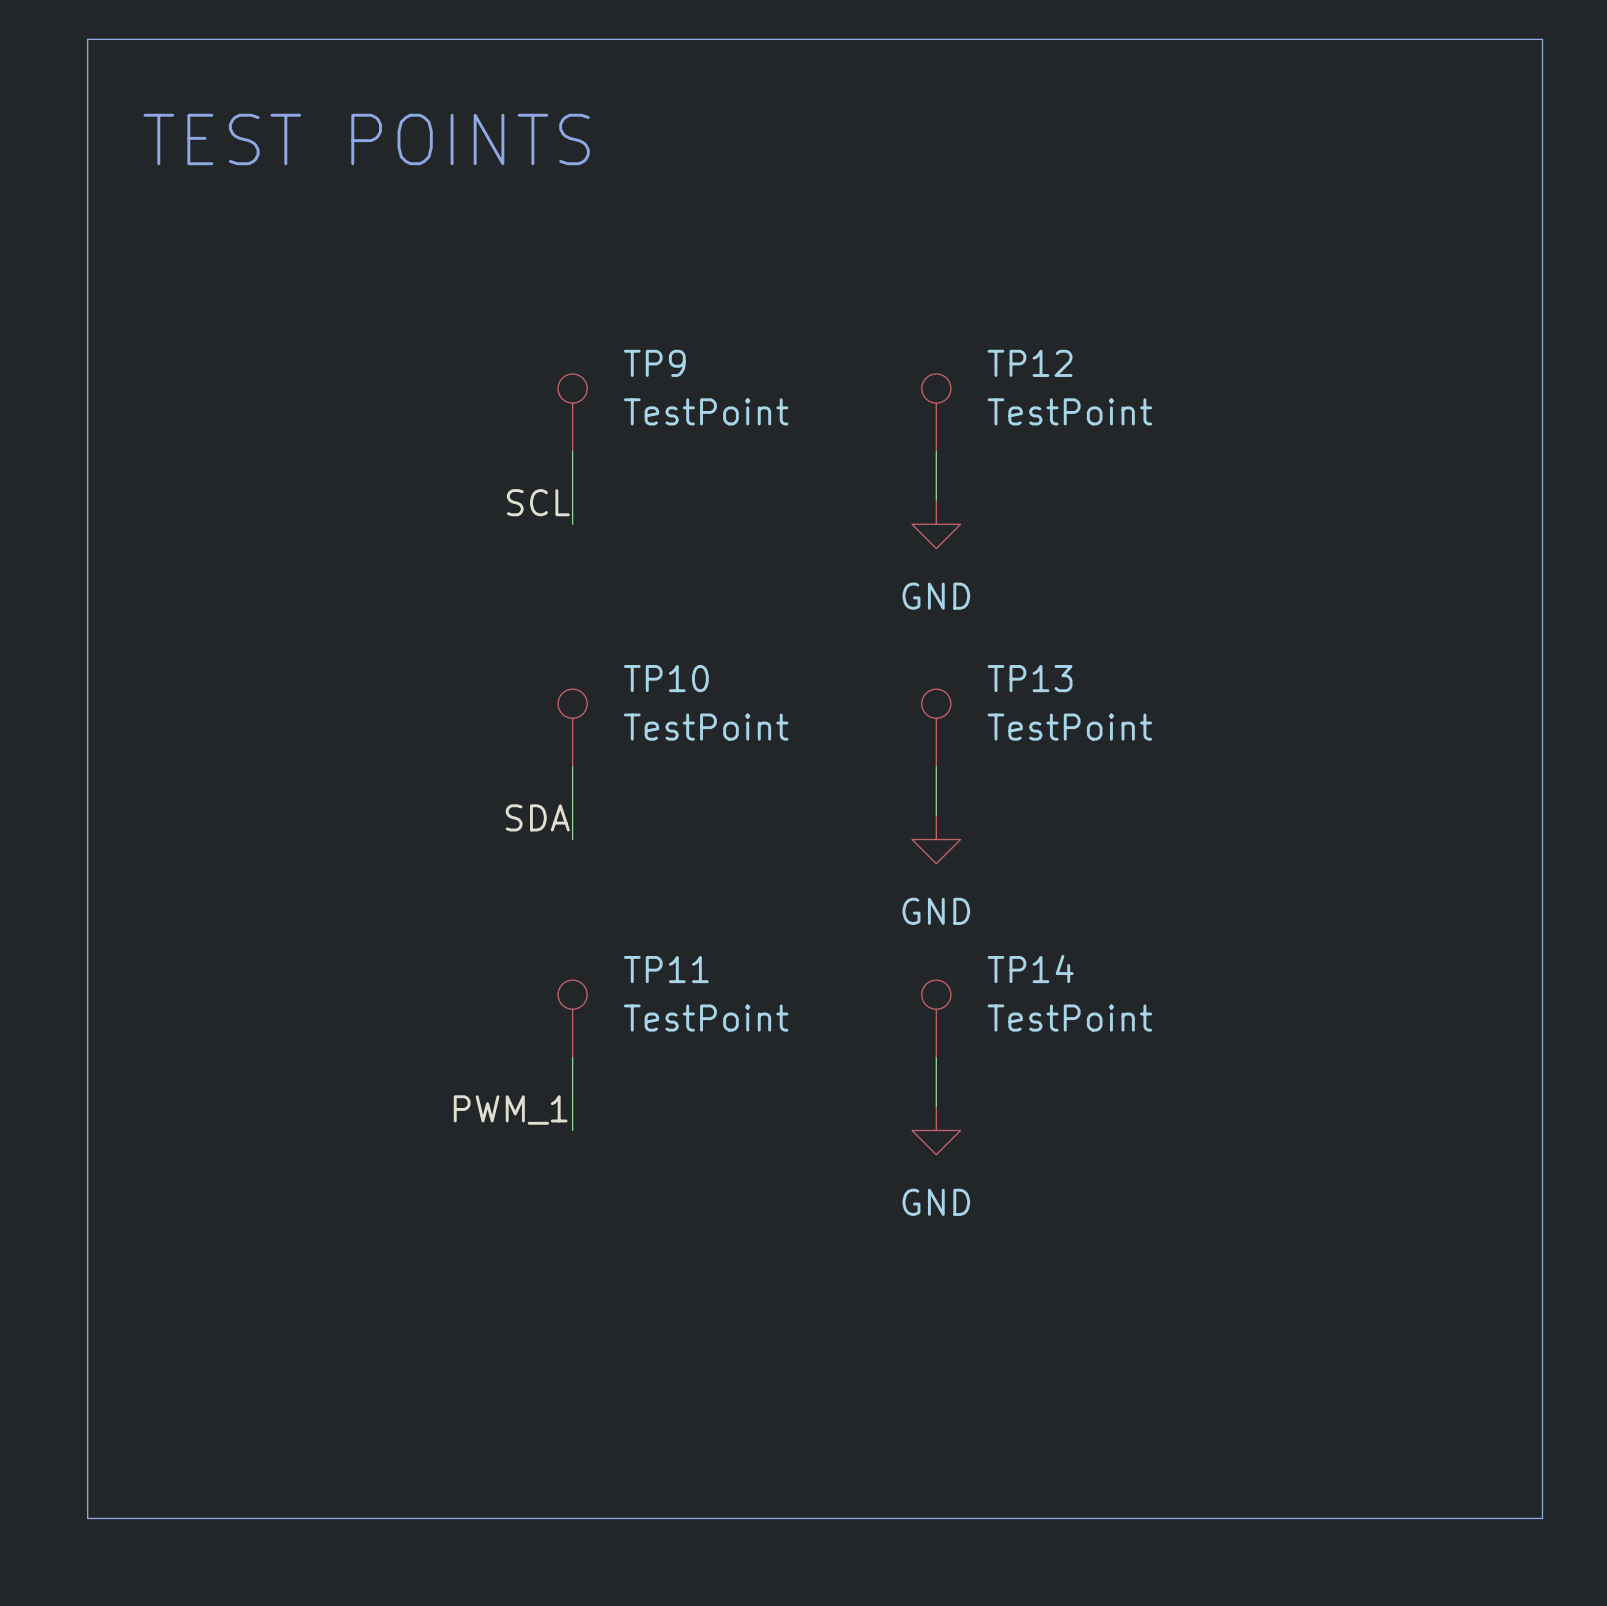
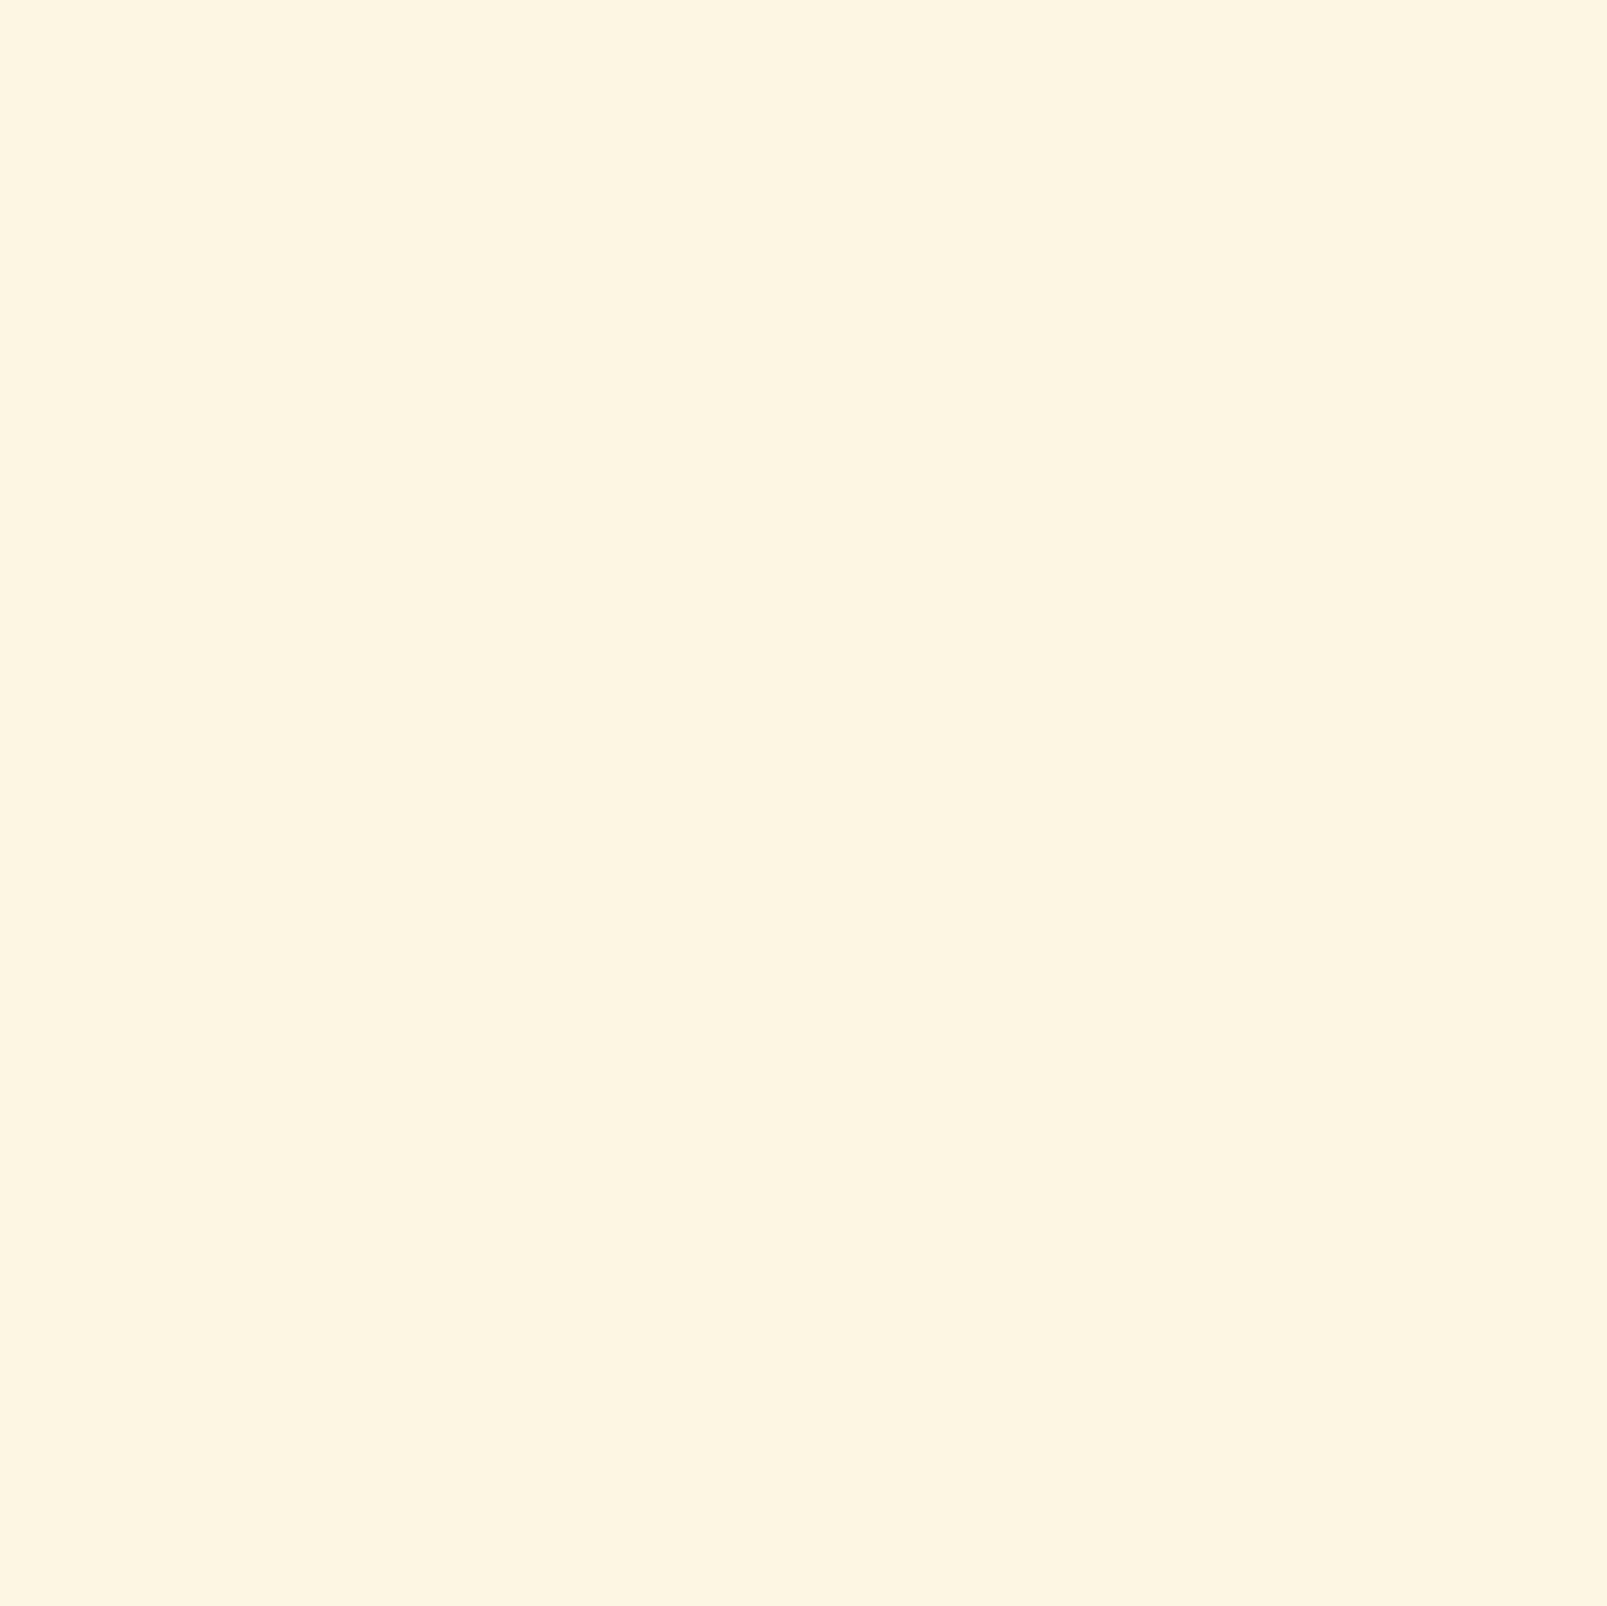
line: (87, 39) (1542, 39) (1542, 1518) (87, 1518) (87, 39) -> none
text: TEST POINTS (366, 139) -> none
TP9: TestPoint (572, 412) -> none
TP12: TestPoint (936, 412) -> none
wire: (572, 451) (572, 524) -> none
wire: (936, 451) (936, 500) -> none
label: SCL (538, 502) -> none
power symbol: GND (936, 524) -> none
TP10: TestPoint (572, 727) -> none
TP13: TestPoint (936, 727) -> none
wire: (572, 766) (572, 839) -> none
wire: (936, 766) (936, 815) -> none
label: SDA (537, 817) -> none
power symbol: GND (936, 839) -> none
TP11: TestPoint (572, 1018) -> none
TP14: TestPoint (936, 1018) -> none
wire: (572, 1057) (572, 1130) -> none
wire: (936, 1057) (936, 1106) -> none
label: PWM_1 (510, 1110) -> none
power symbol: GND (936, 1130) -> none

